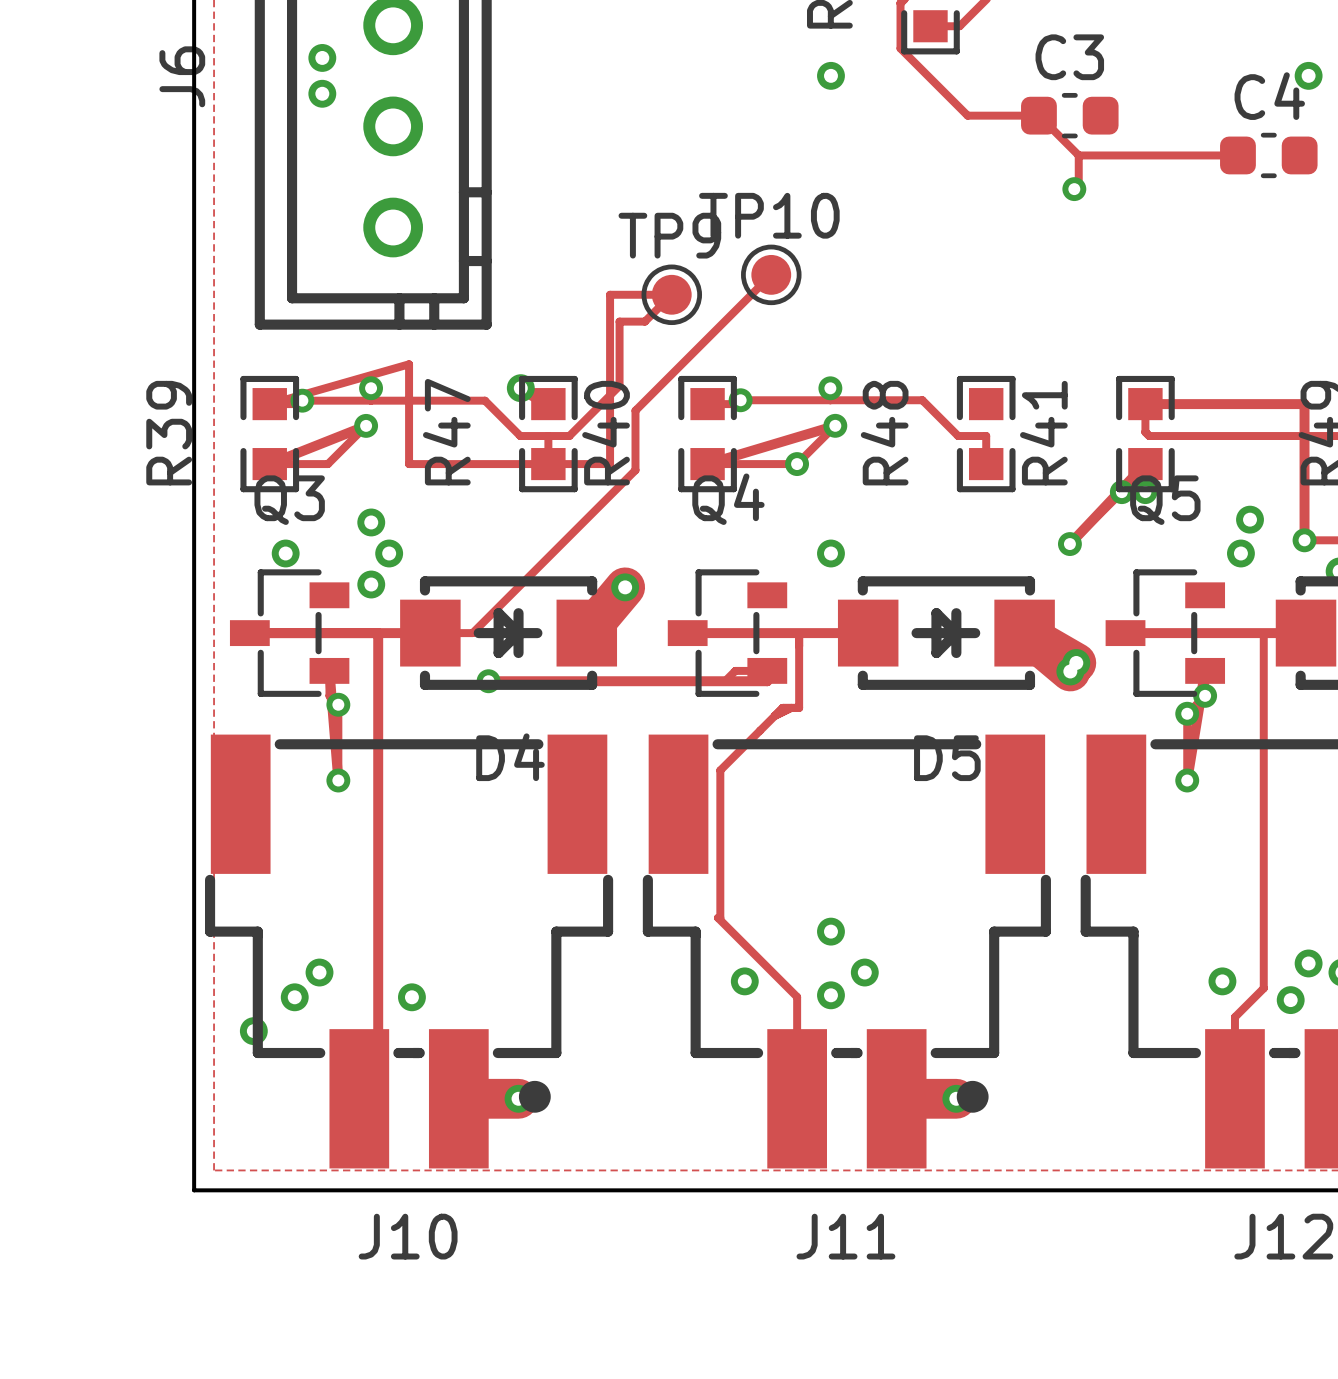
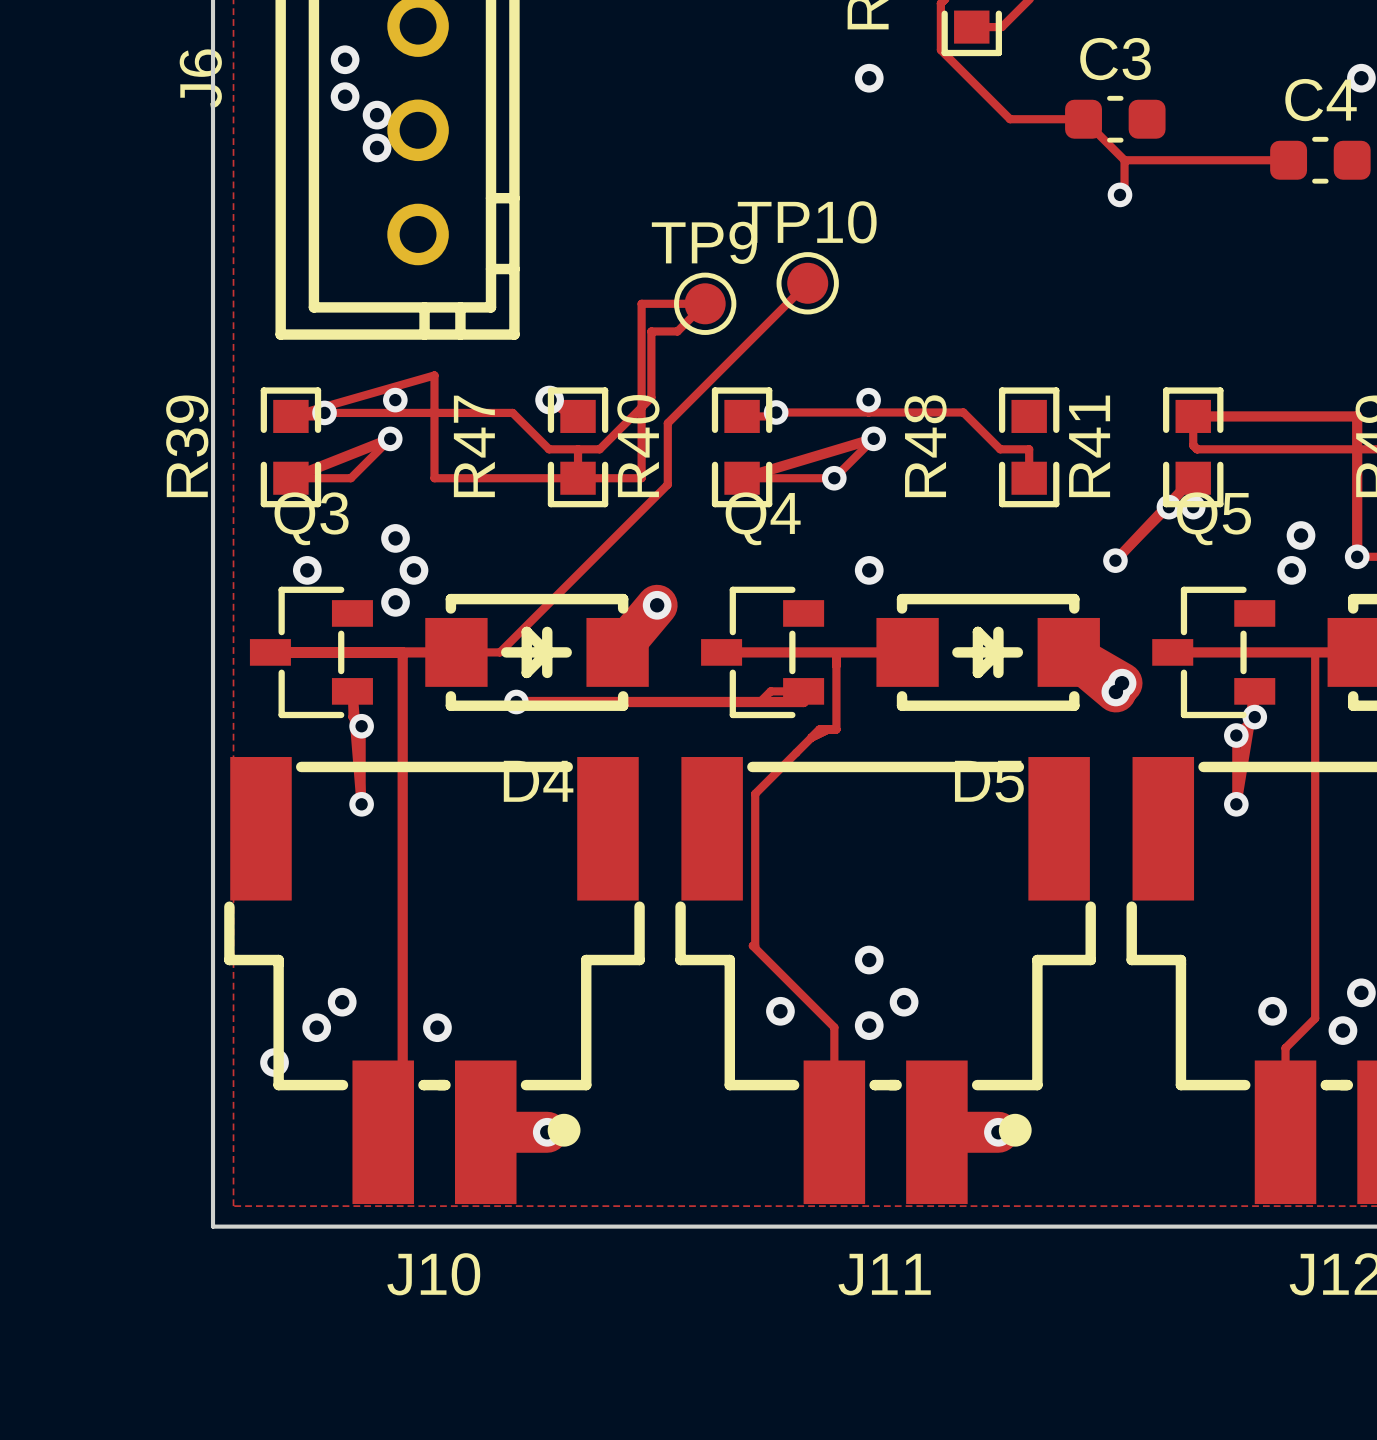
via: none -> (377, 115)
via: none -> (377, 147)

